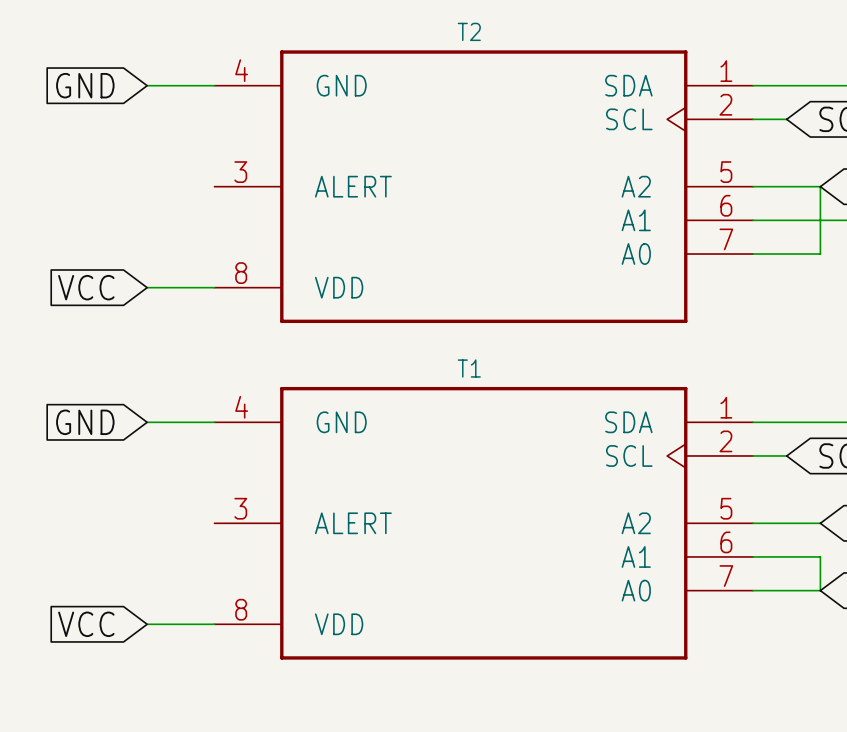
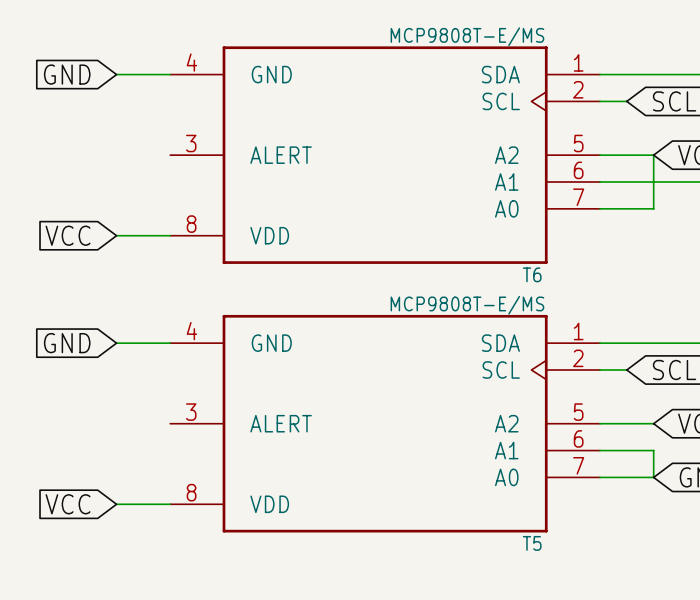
T2 name: T2 (469, 31) -> T6 (532, 274)
T2 value: none -> MCP9808T-E/MS (467, 36)
T1 name: T1 (469, 368) -> T5 (532, 543)
T1 value: none -> MCP9808T-E/MS (467, 305)

